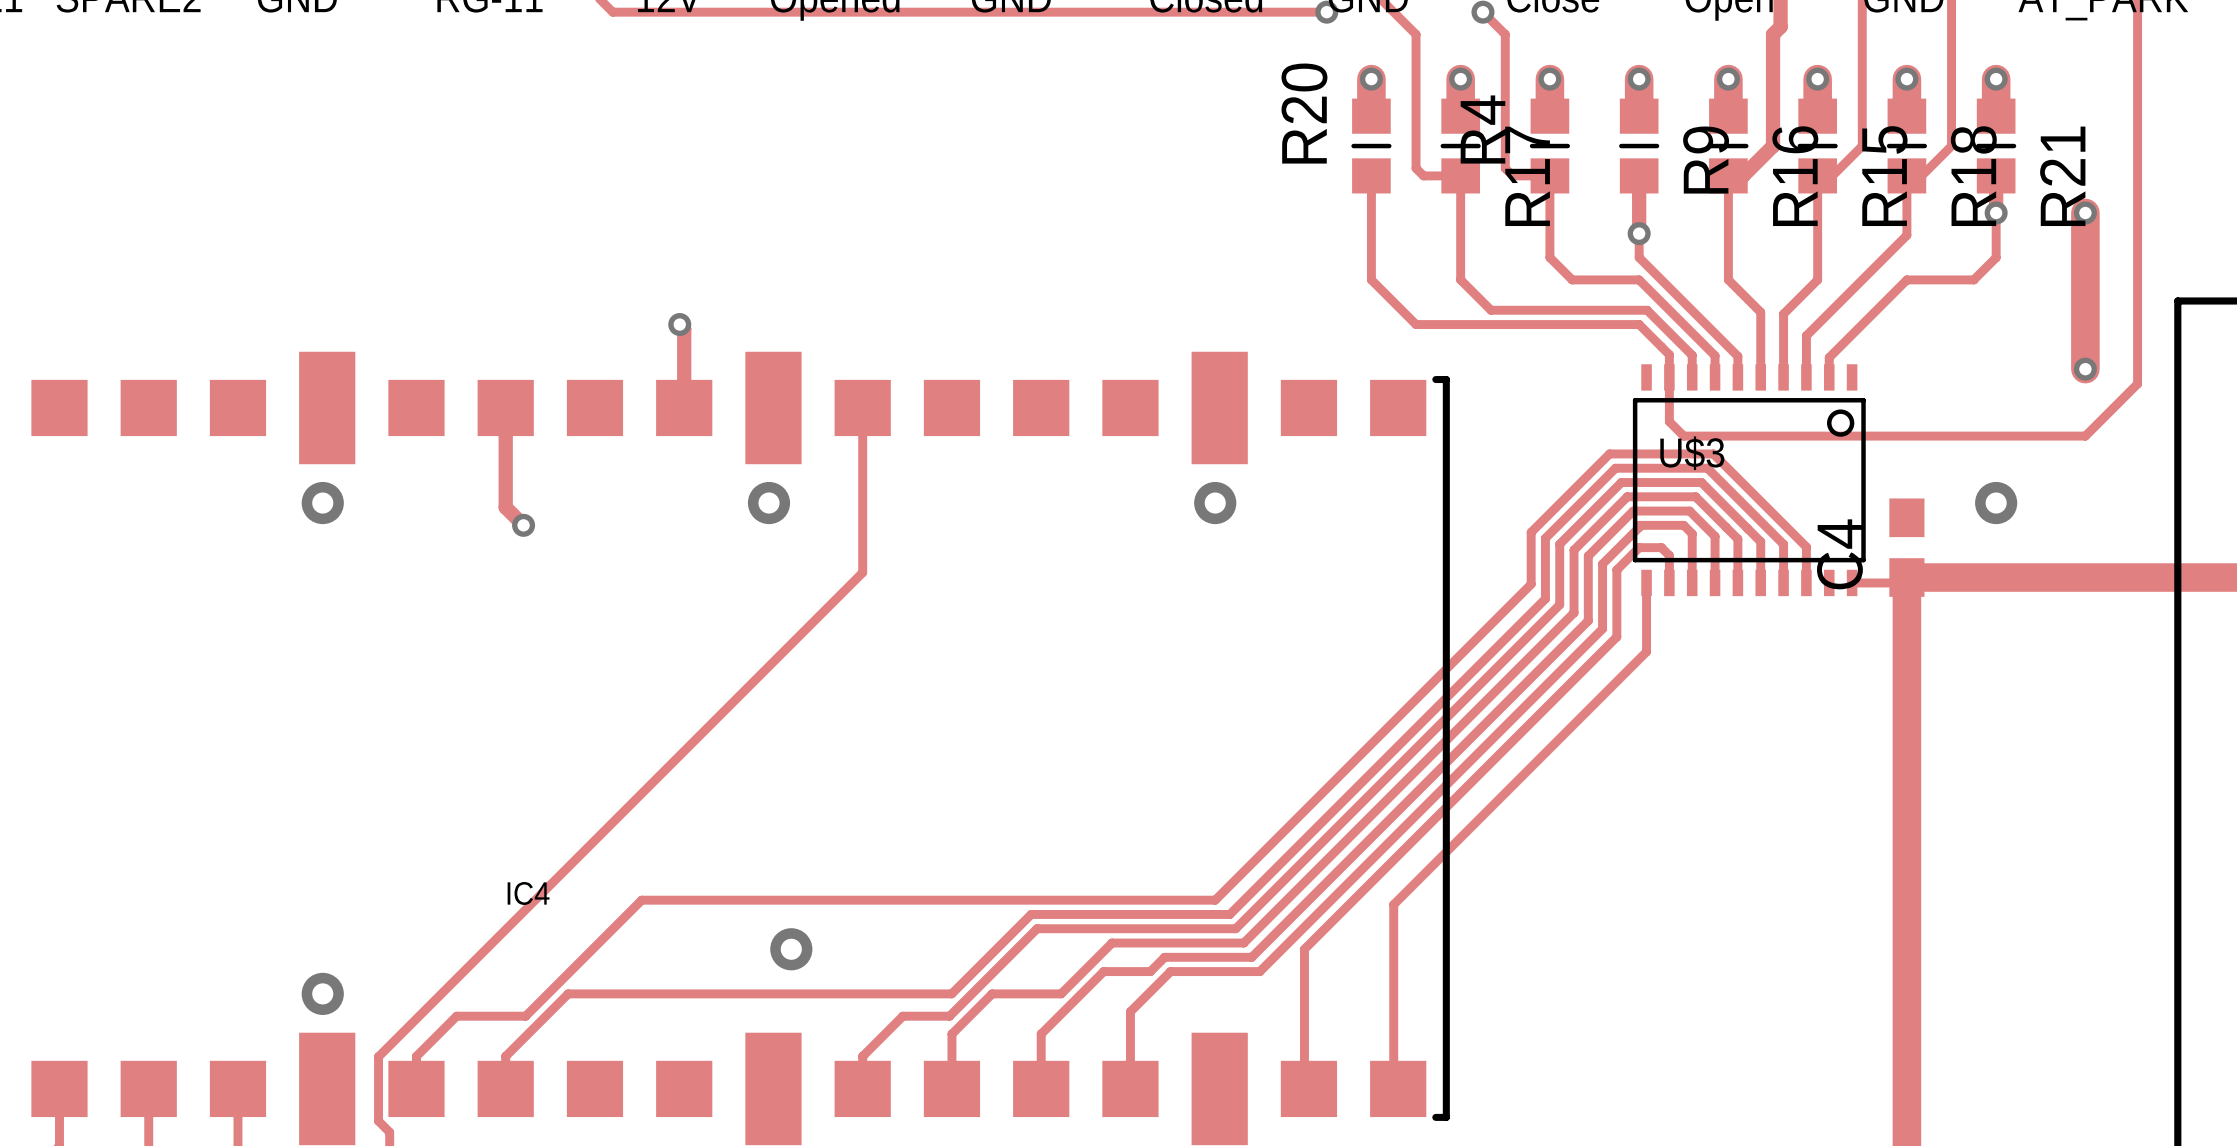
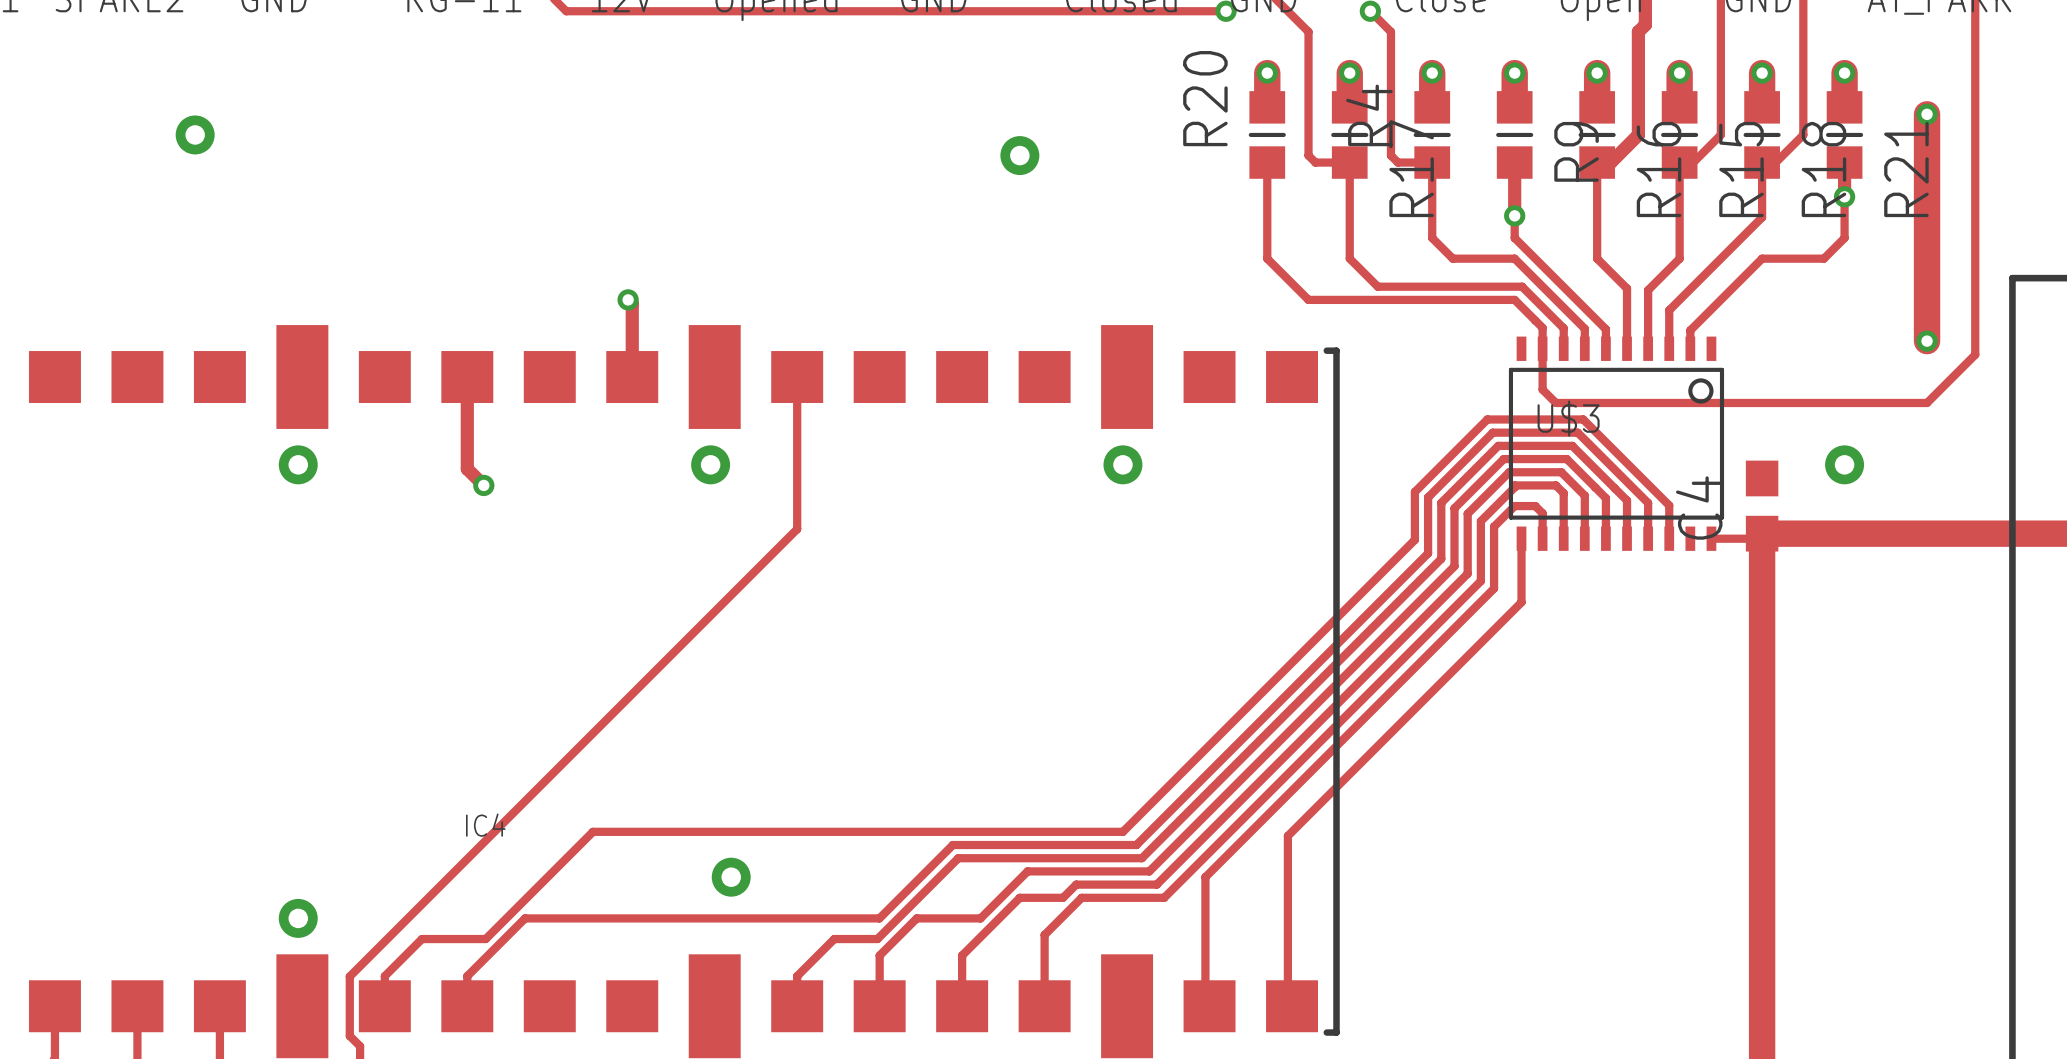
track: none -> (1927, 114) (1927, 196)
via: none -> (195, 134)
via: none -> (1019, 155)
via position: (2085, 212) -> (1927, 114)

